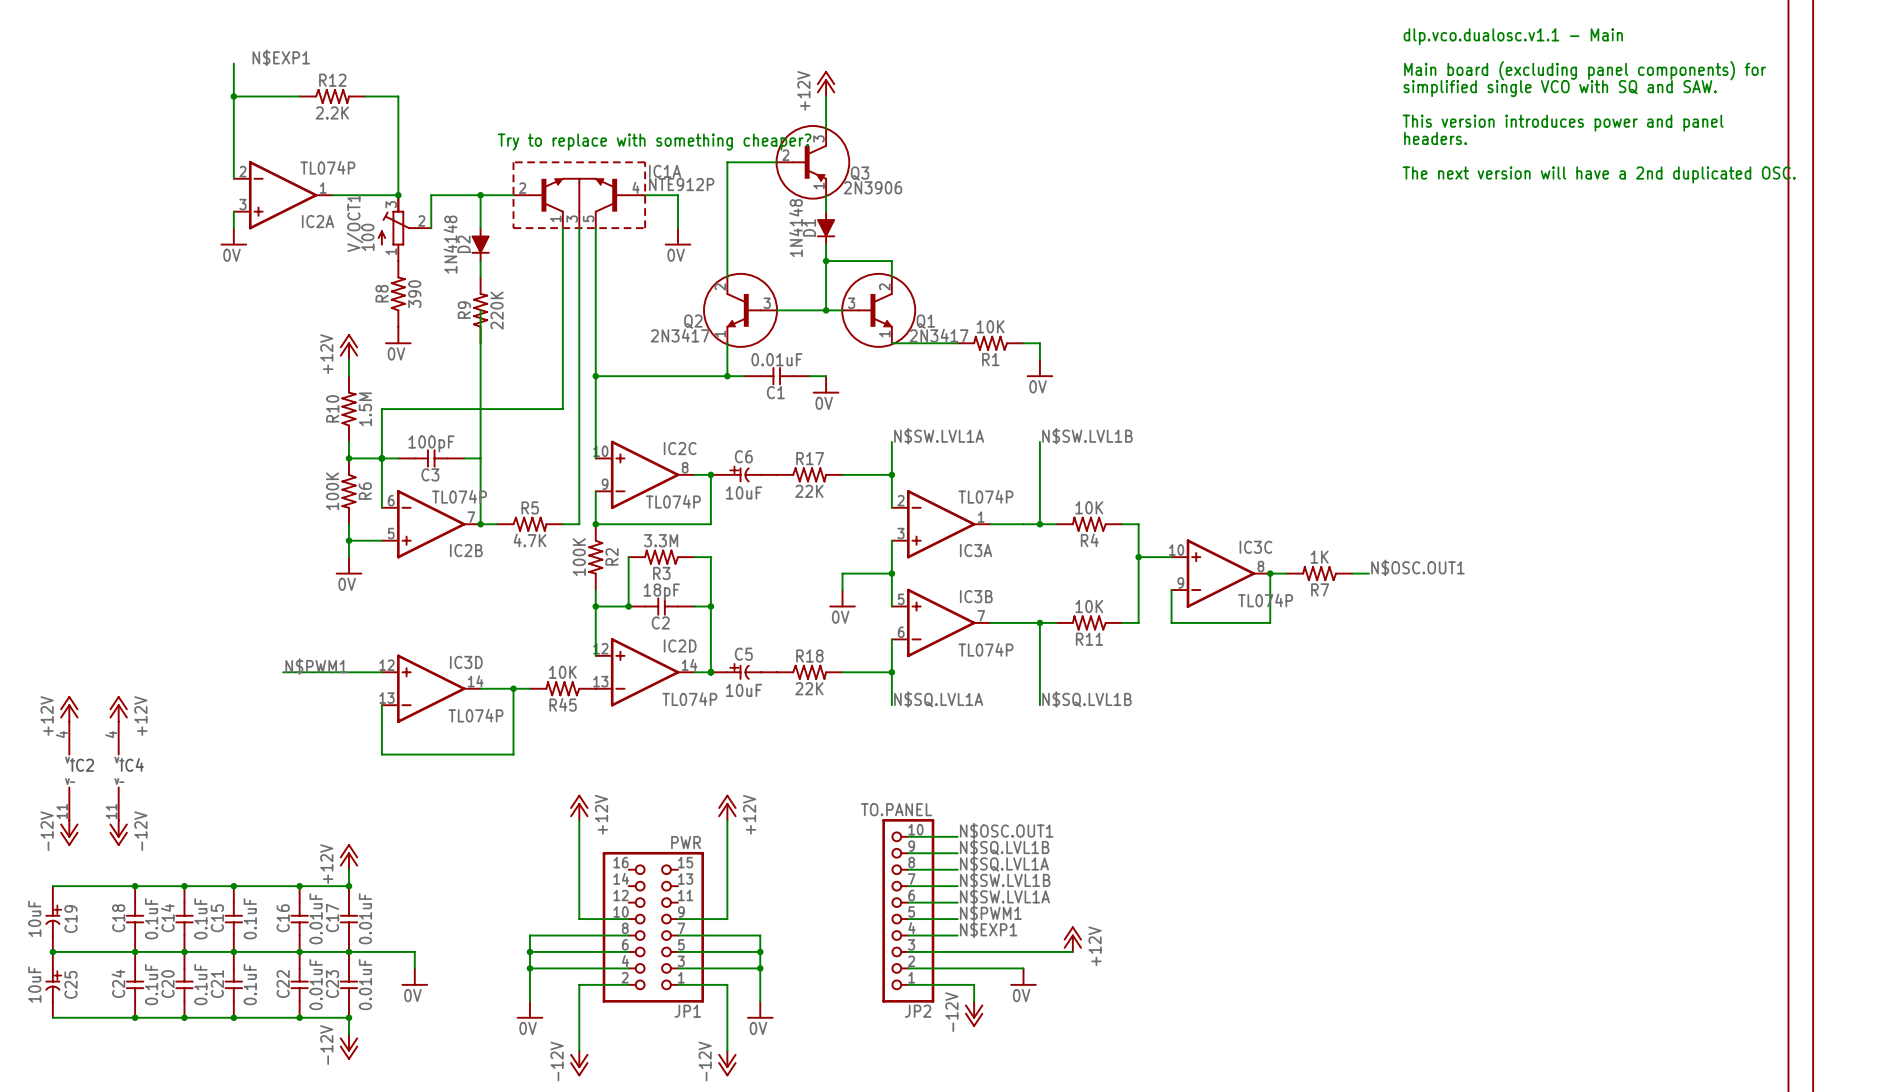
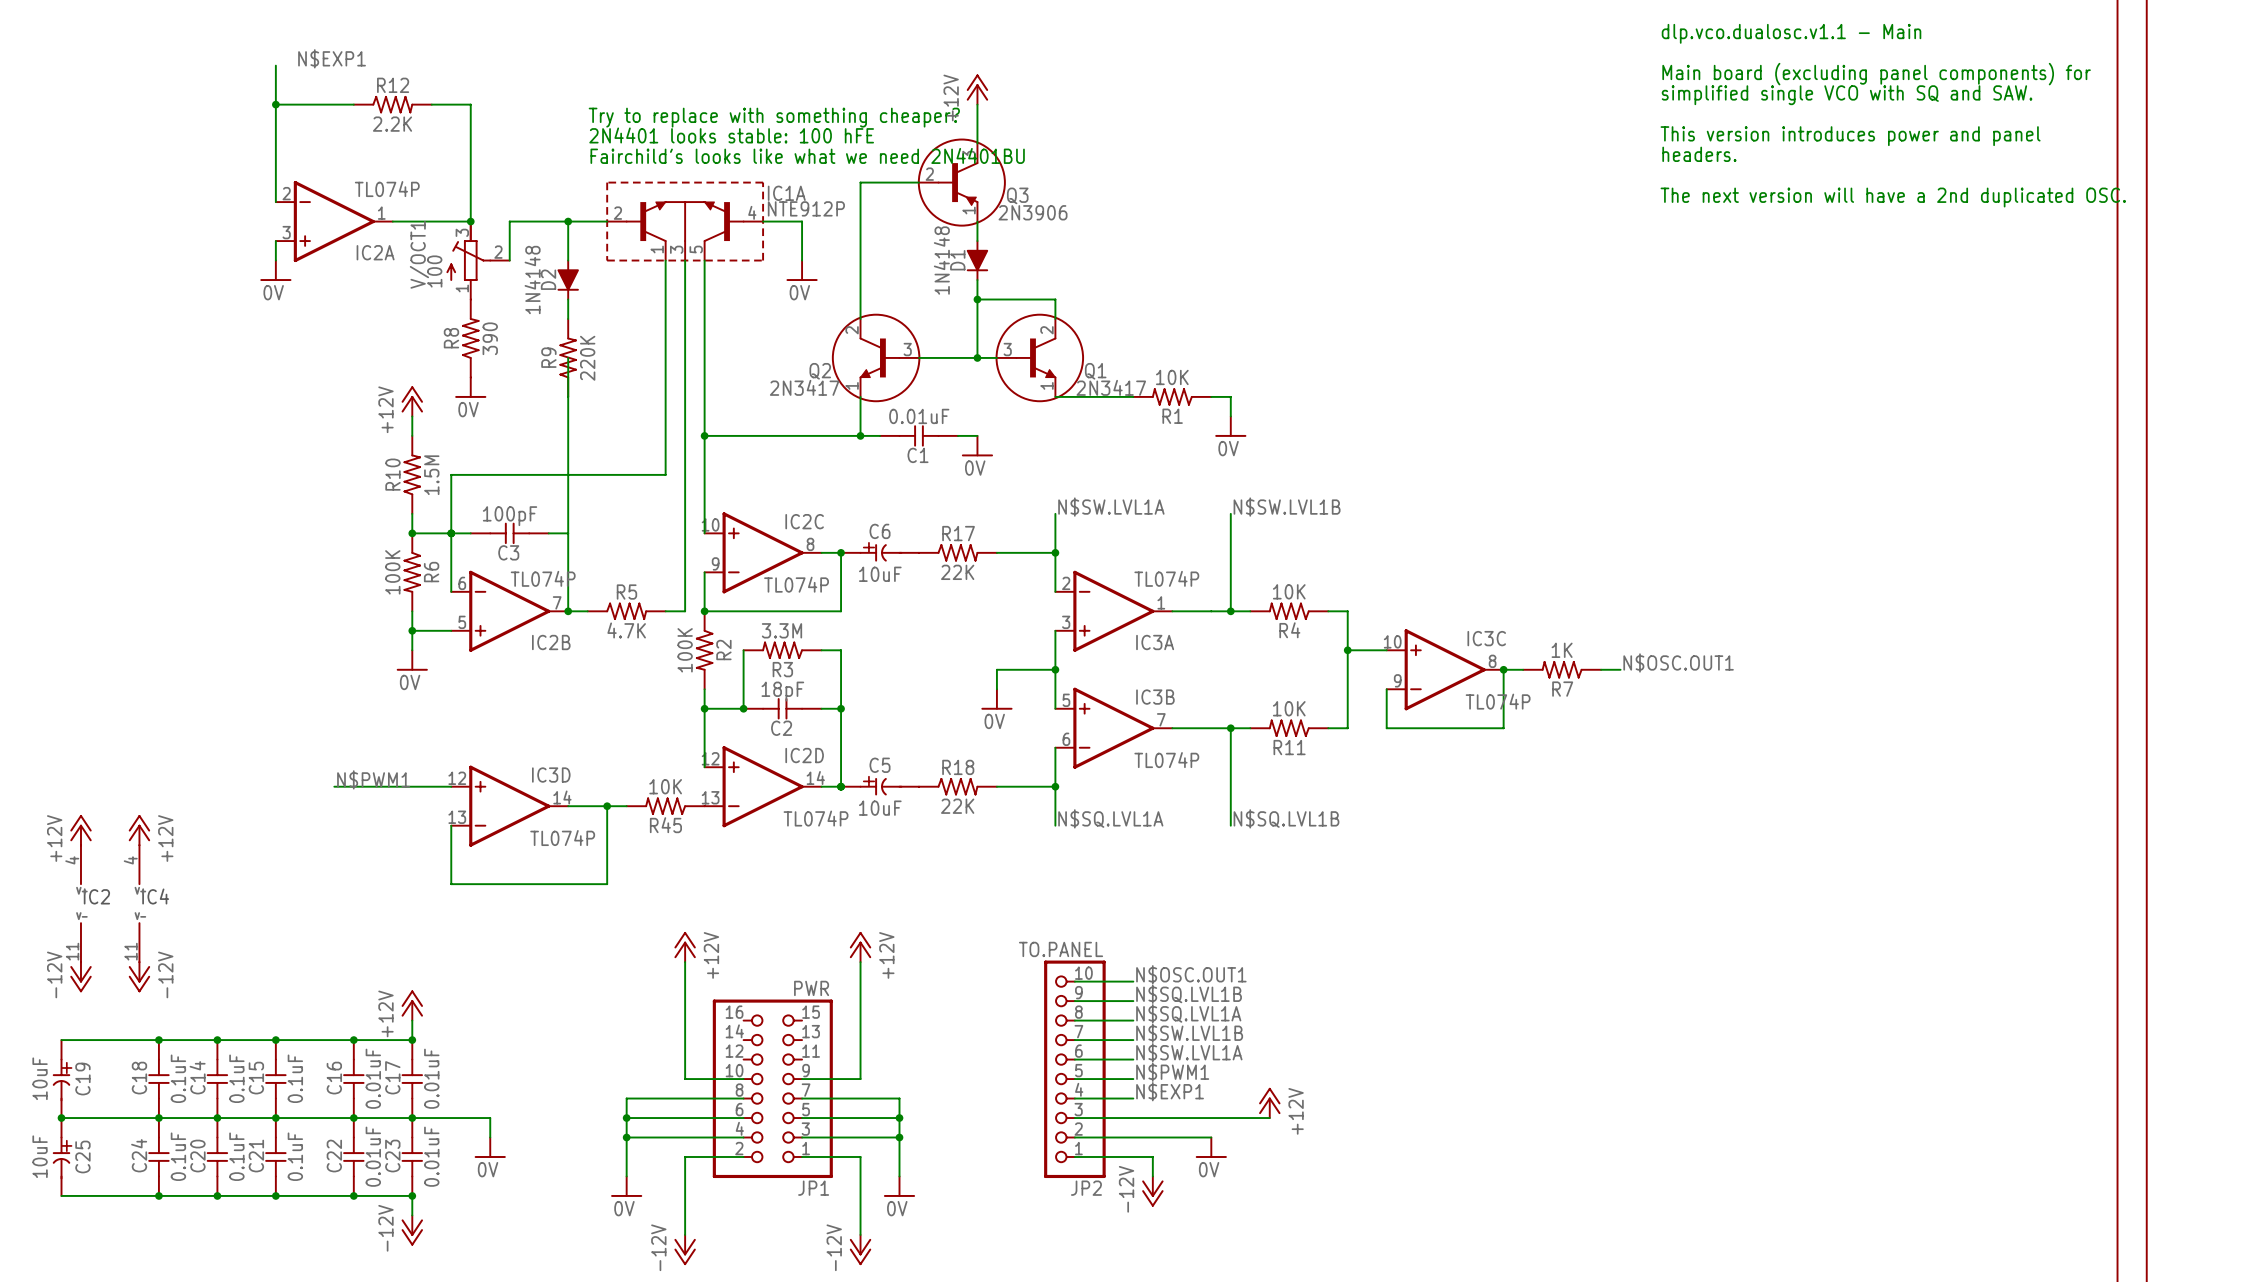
text: none -> Try to replace with something cheaper? (774, 117)
text: none -> 2N4401 looks stable: 100 hFE (731, 135)
text: Try to replace with something cheaper? (654, 142) -> Fairchild's looks like what we need 2N4401BU (807, 155)

